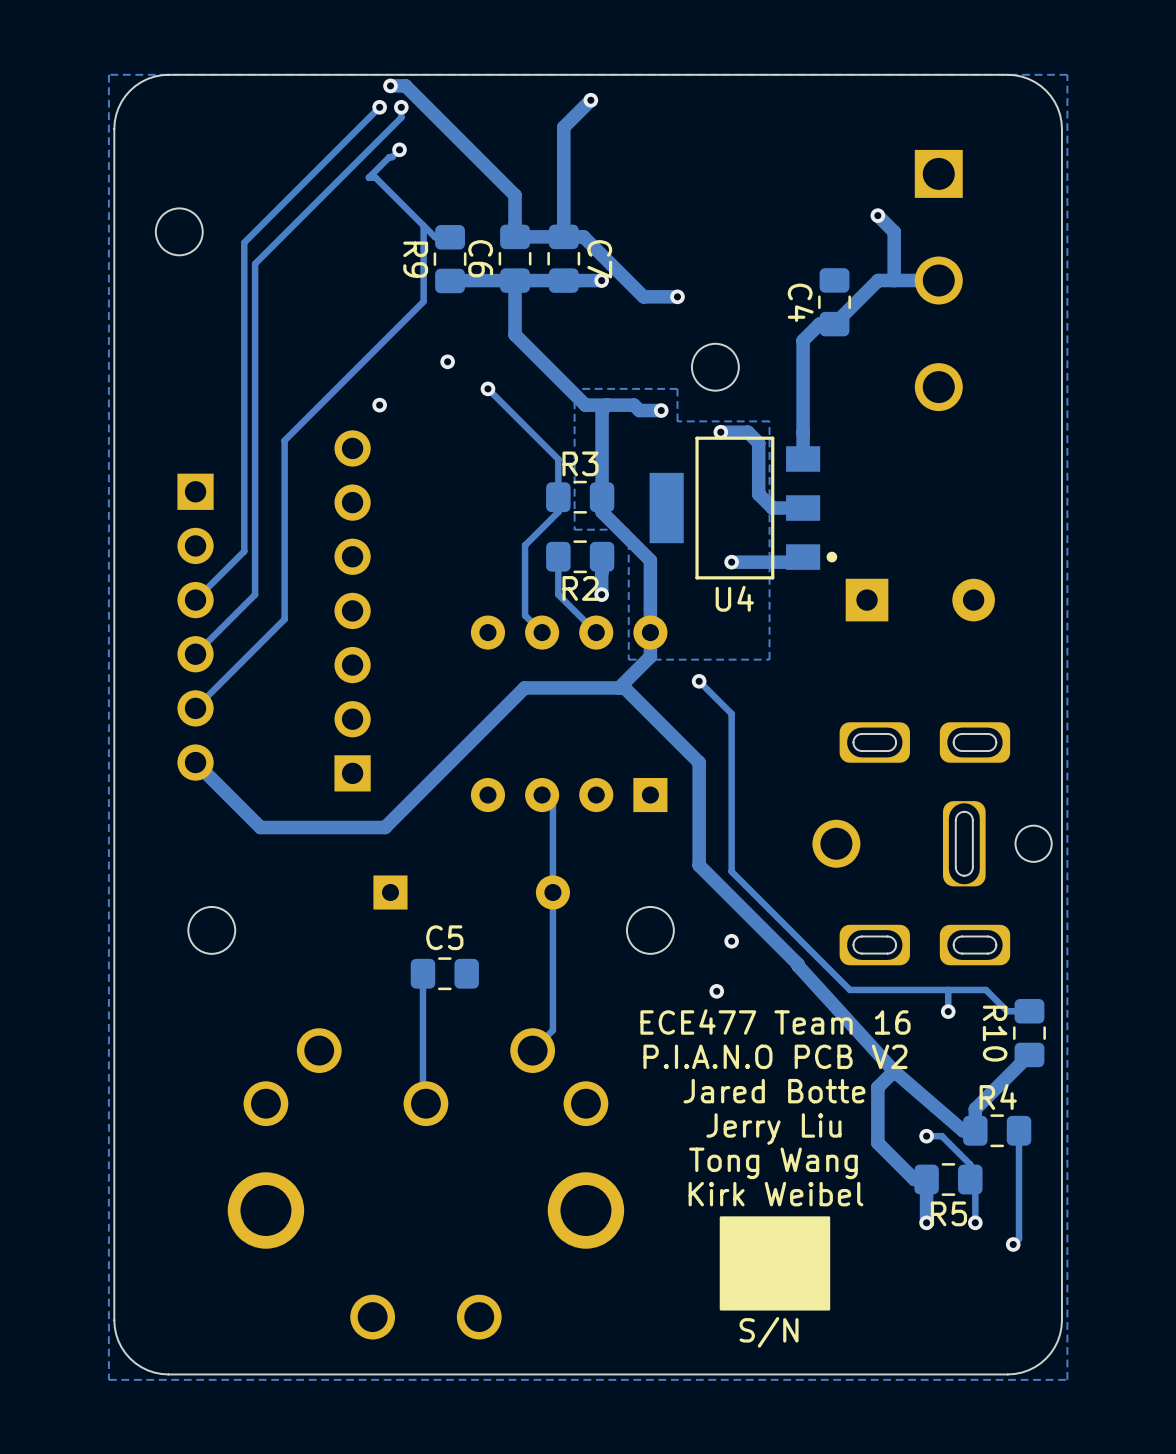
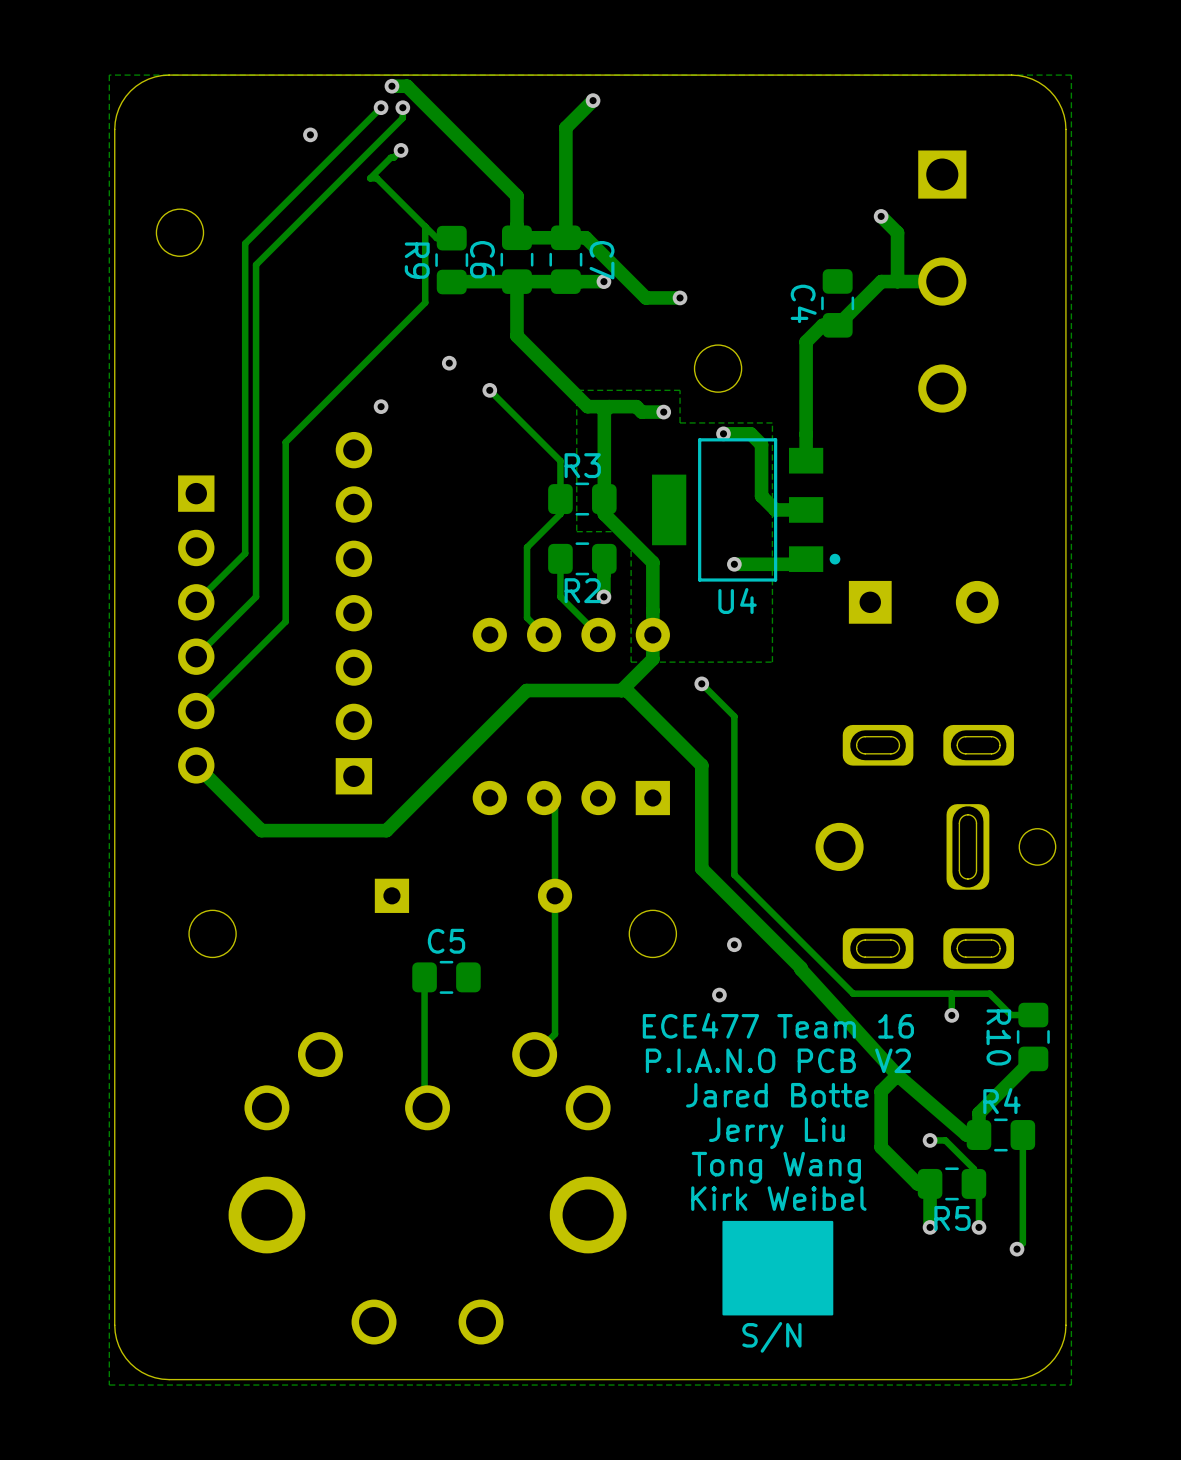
via: none -> (310, 134)

